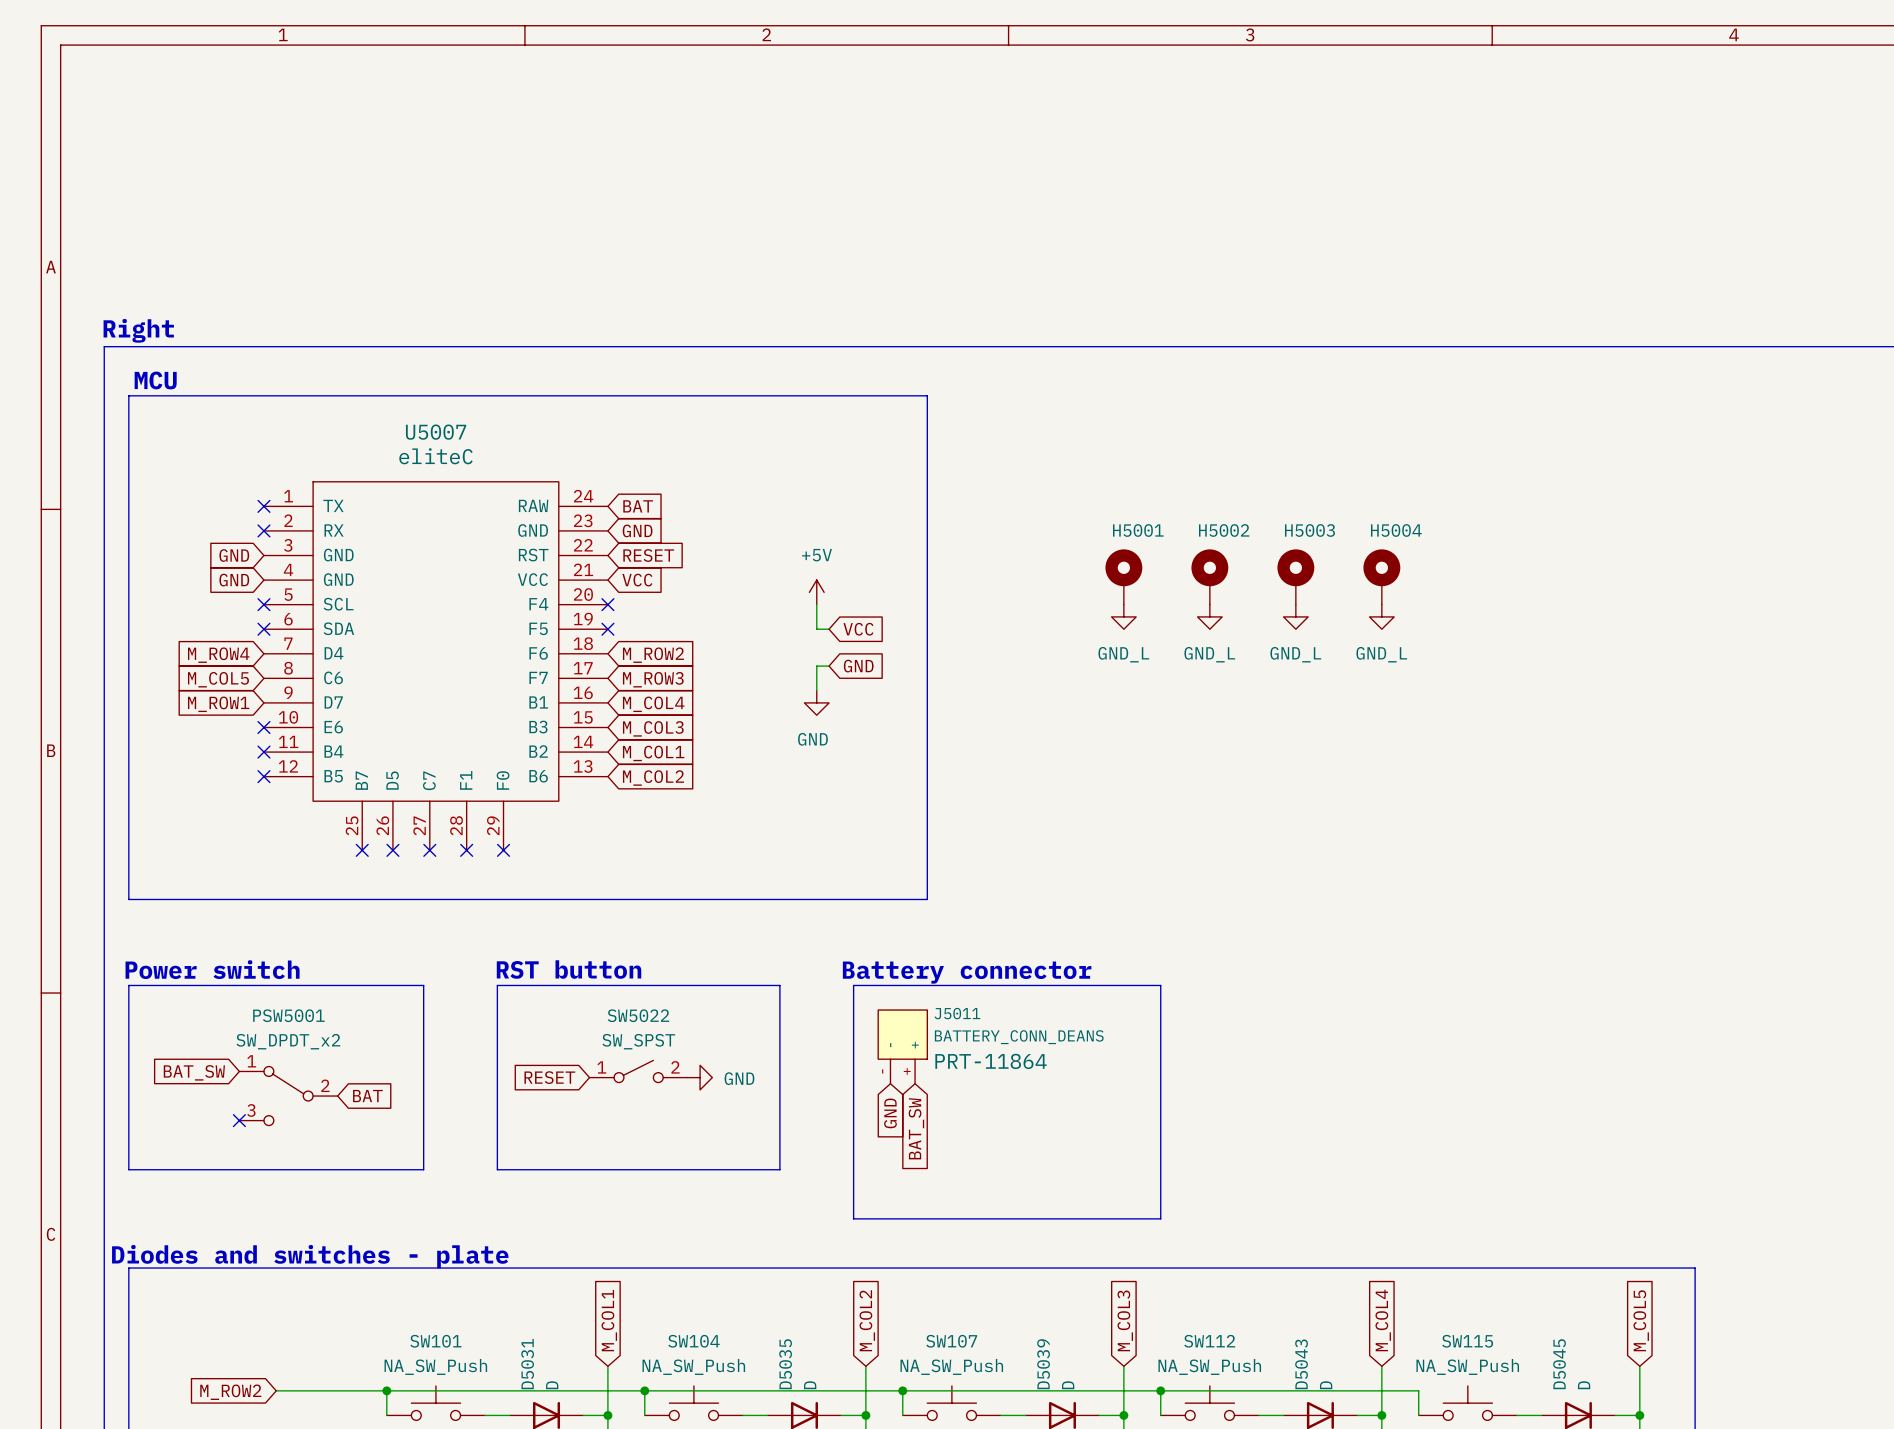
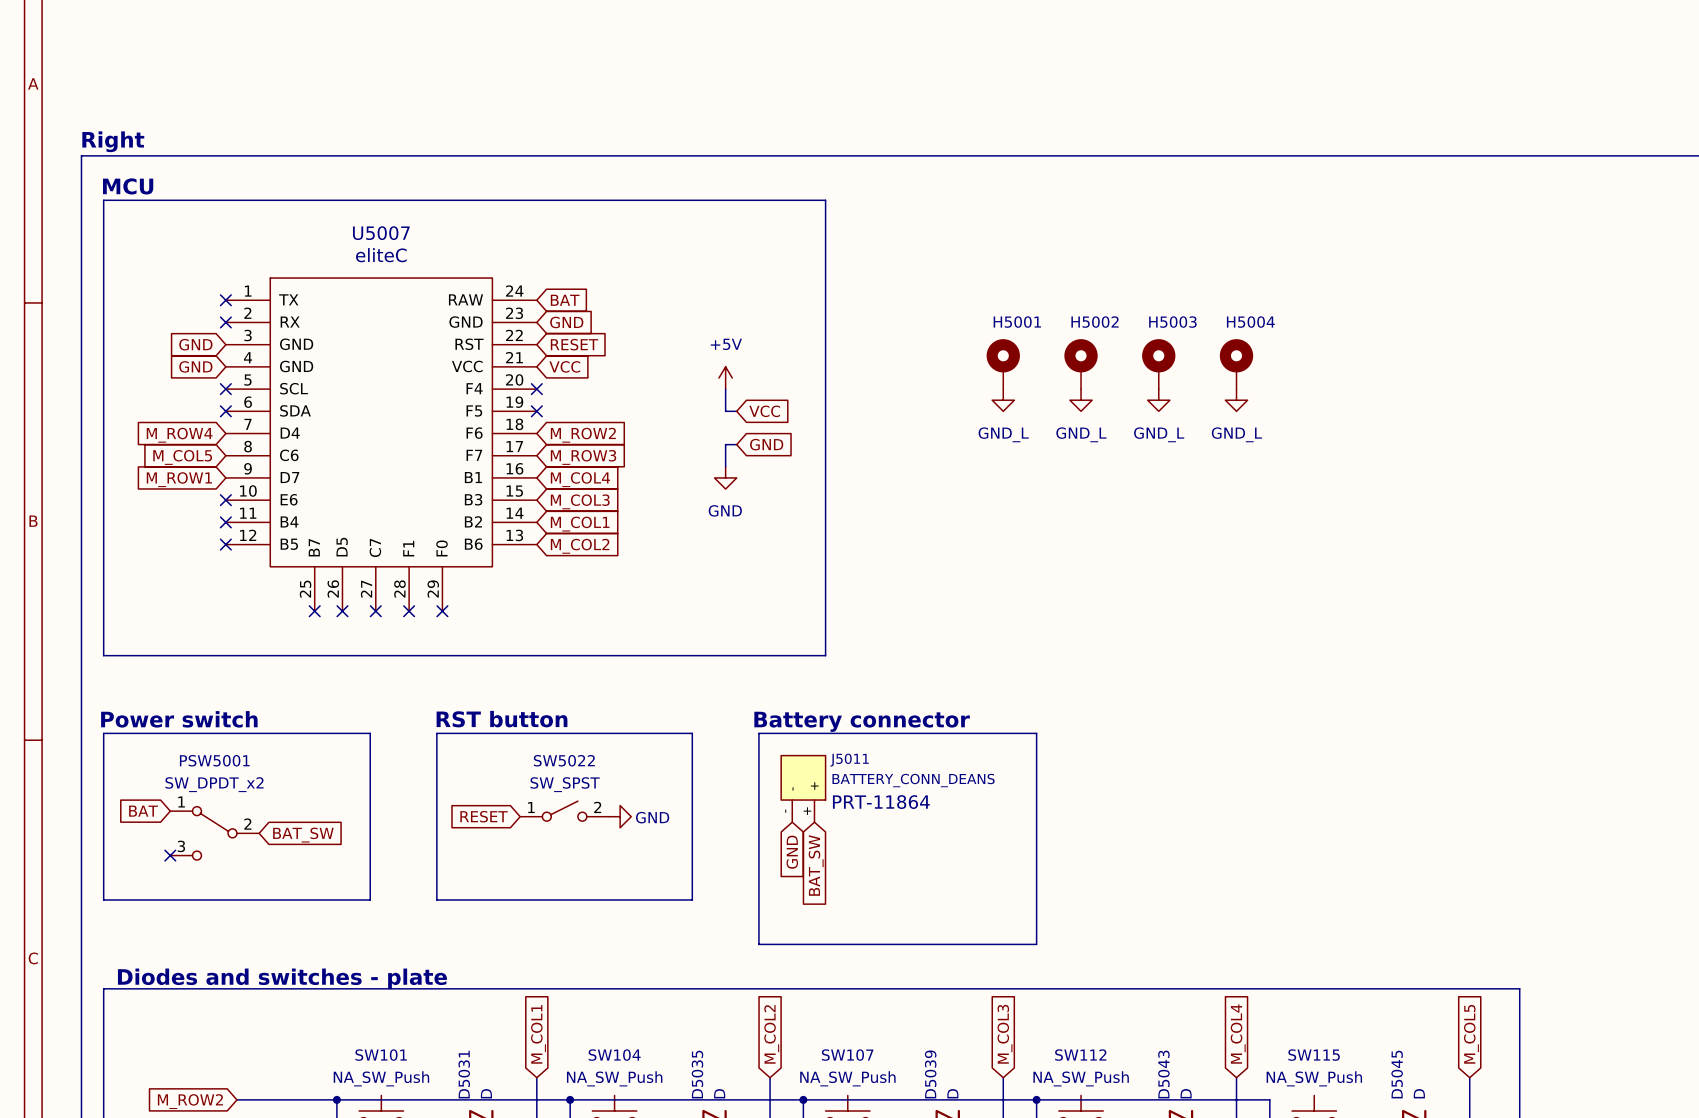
global label rotation: 0° (194, 1072) -> 180° (303, 835)
global label position: BAT_SW (194, 1072) -> BAT_SW (303, 835)
PSW5001 position: (288, 1096) -> (214, 833)
global label rotation: 0° (367, 1096) -> 180° (143, 811)
global label position: BAT (367, 1096) -> BAT (143, 811)
no-connect mark position: (239, 1120) -> (170, 855)

